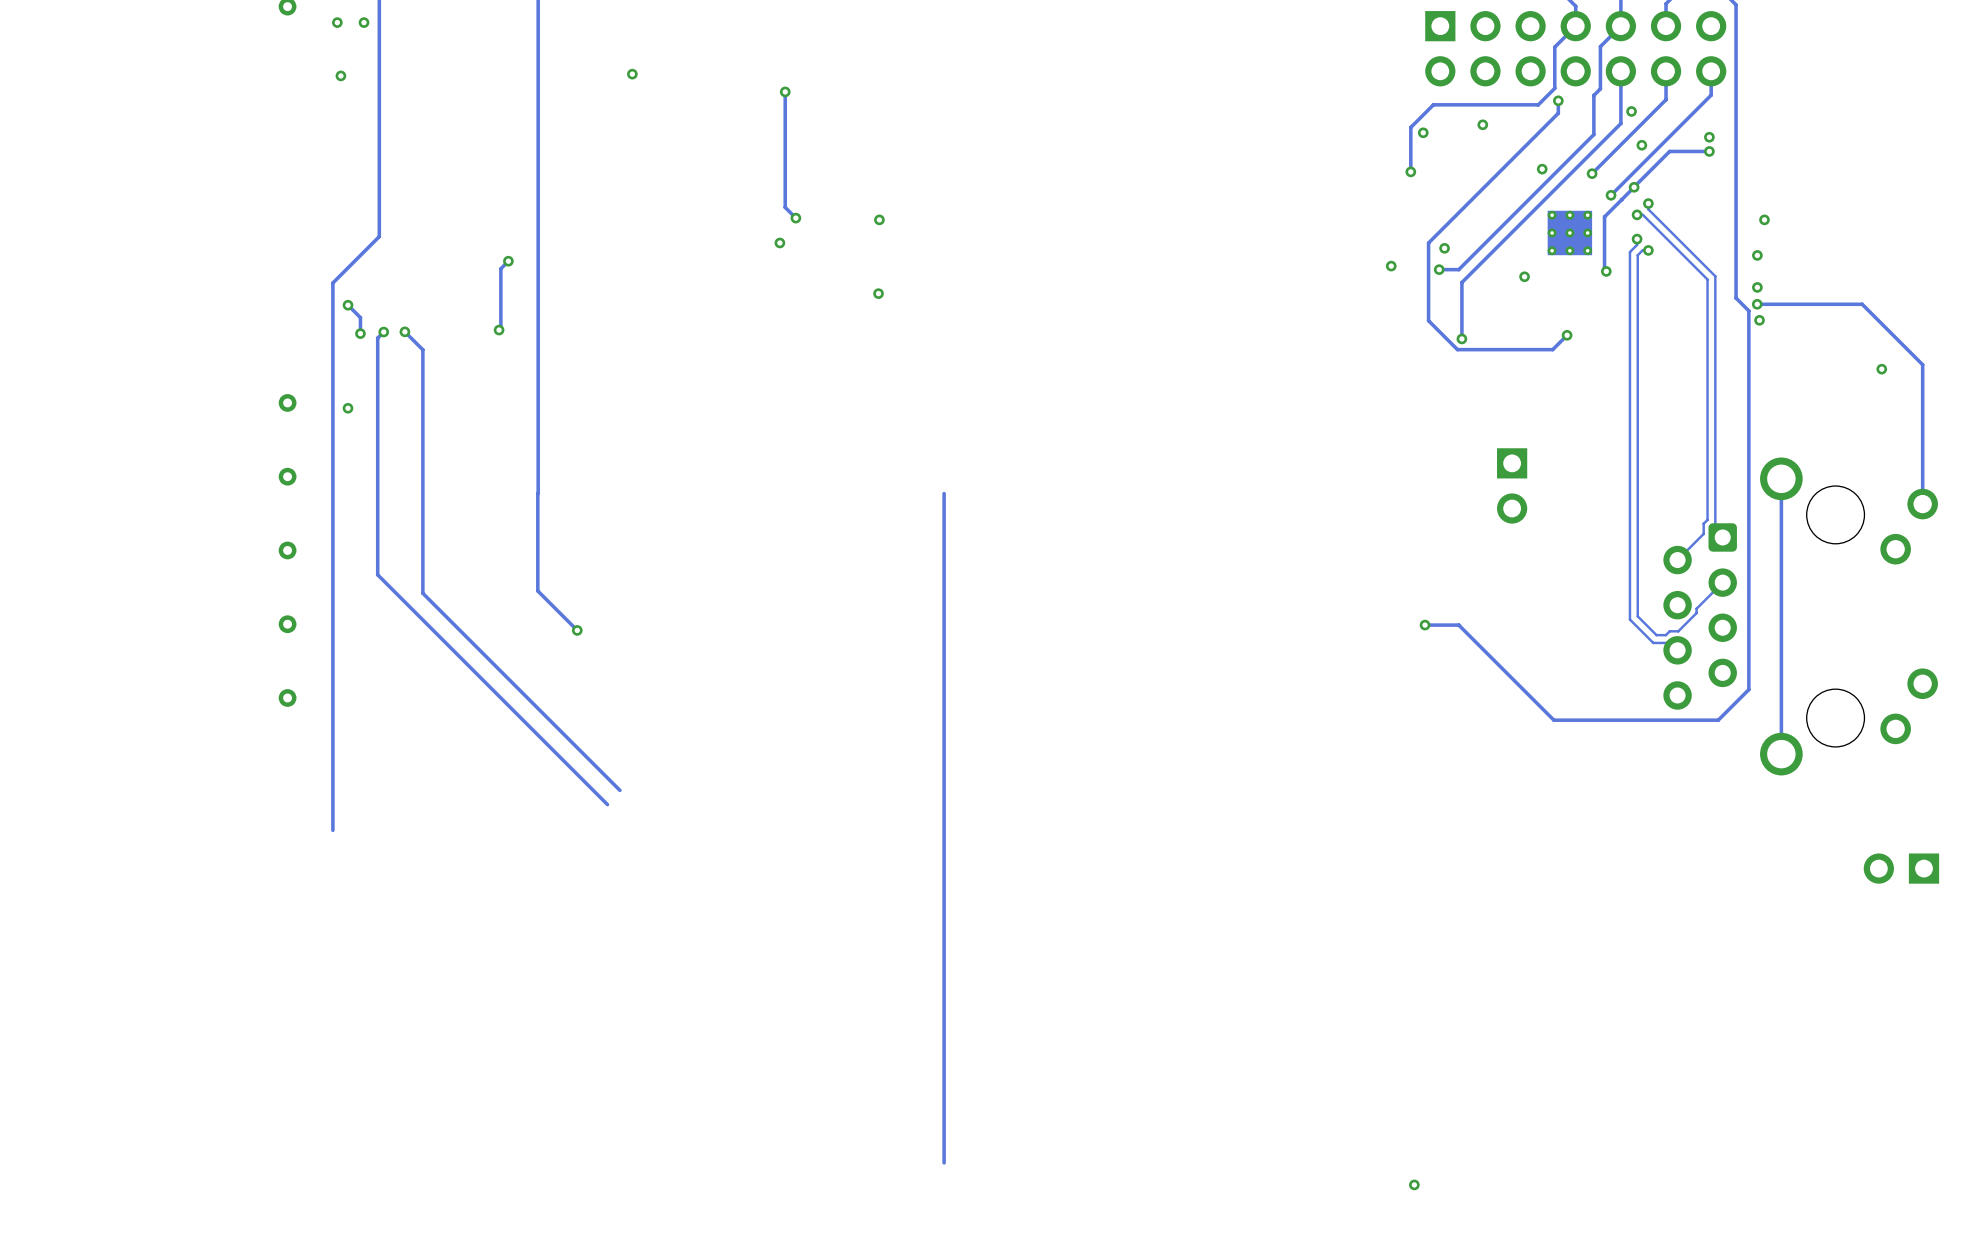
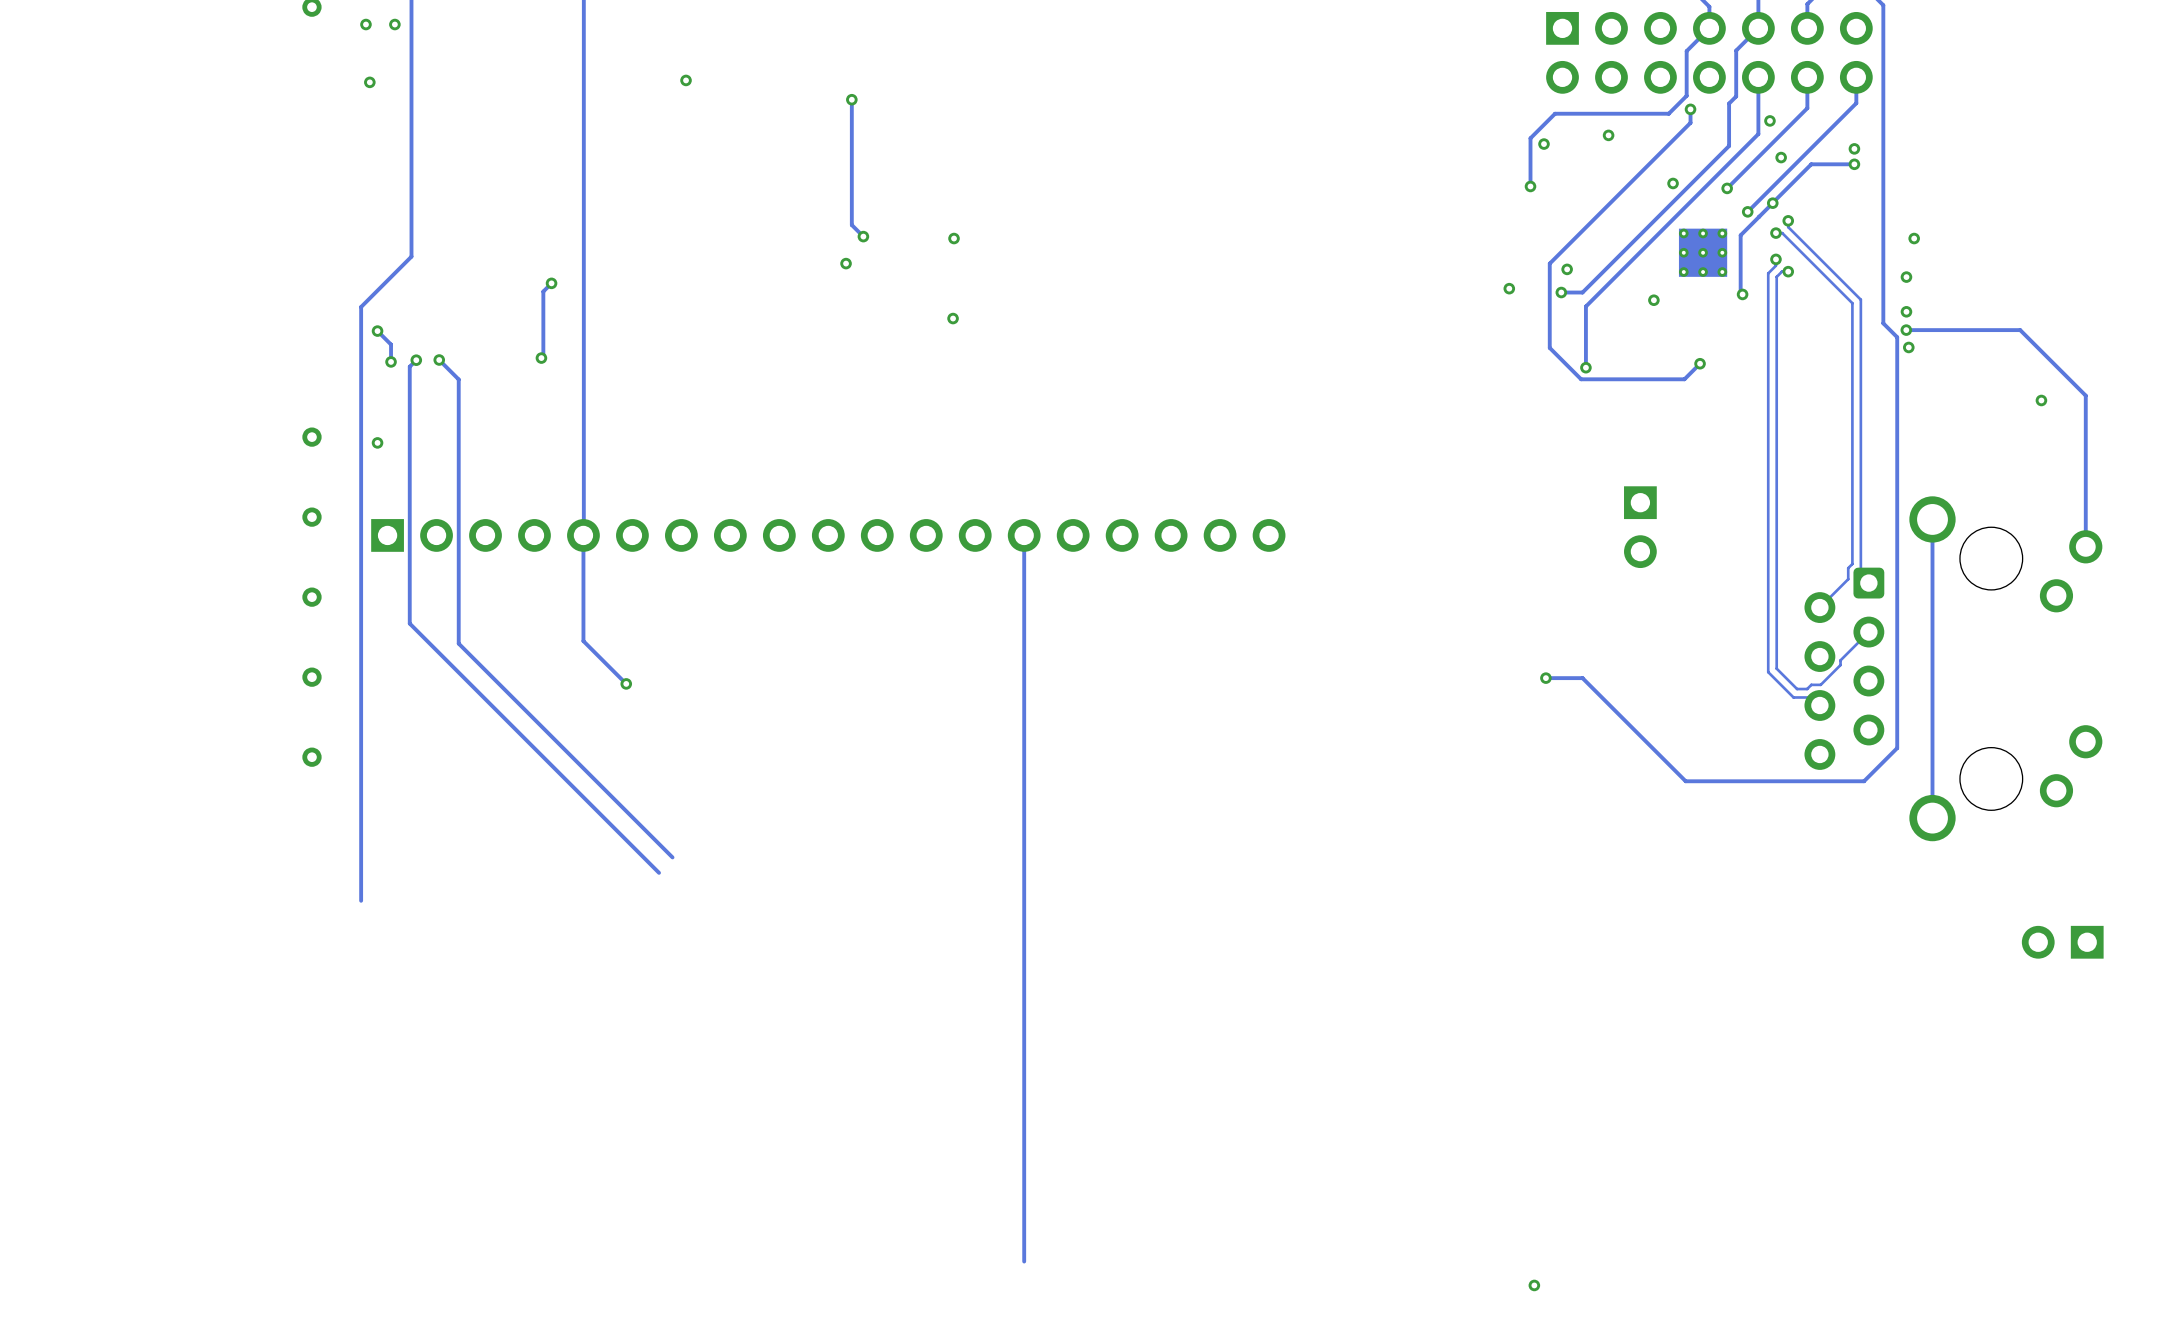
part: none -> (828, 535)

